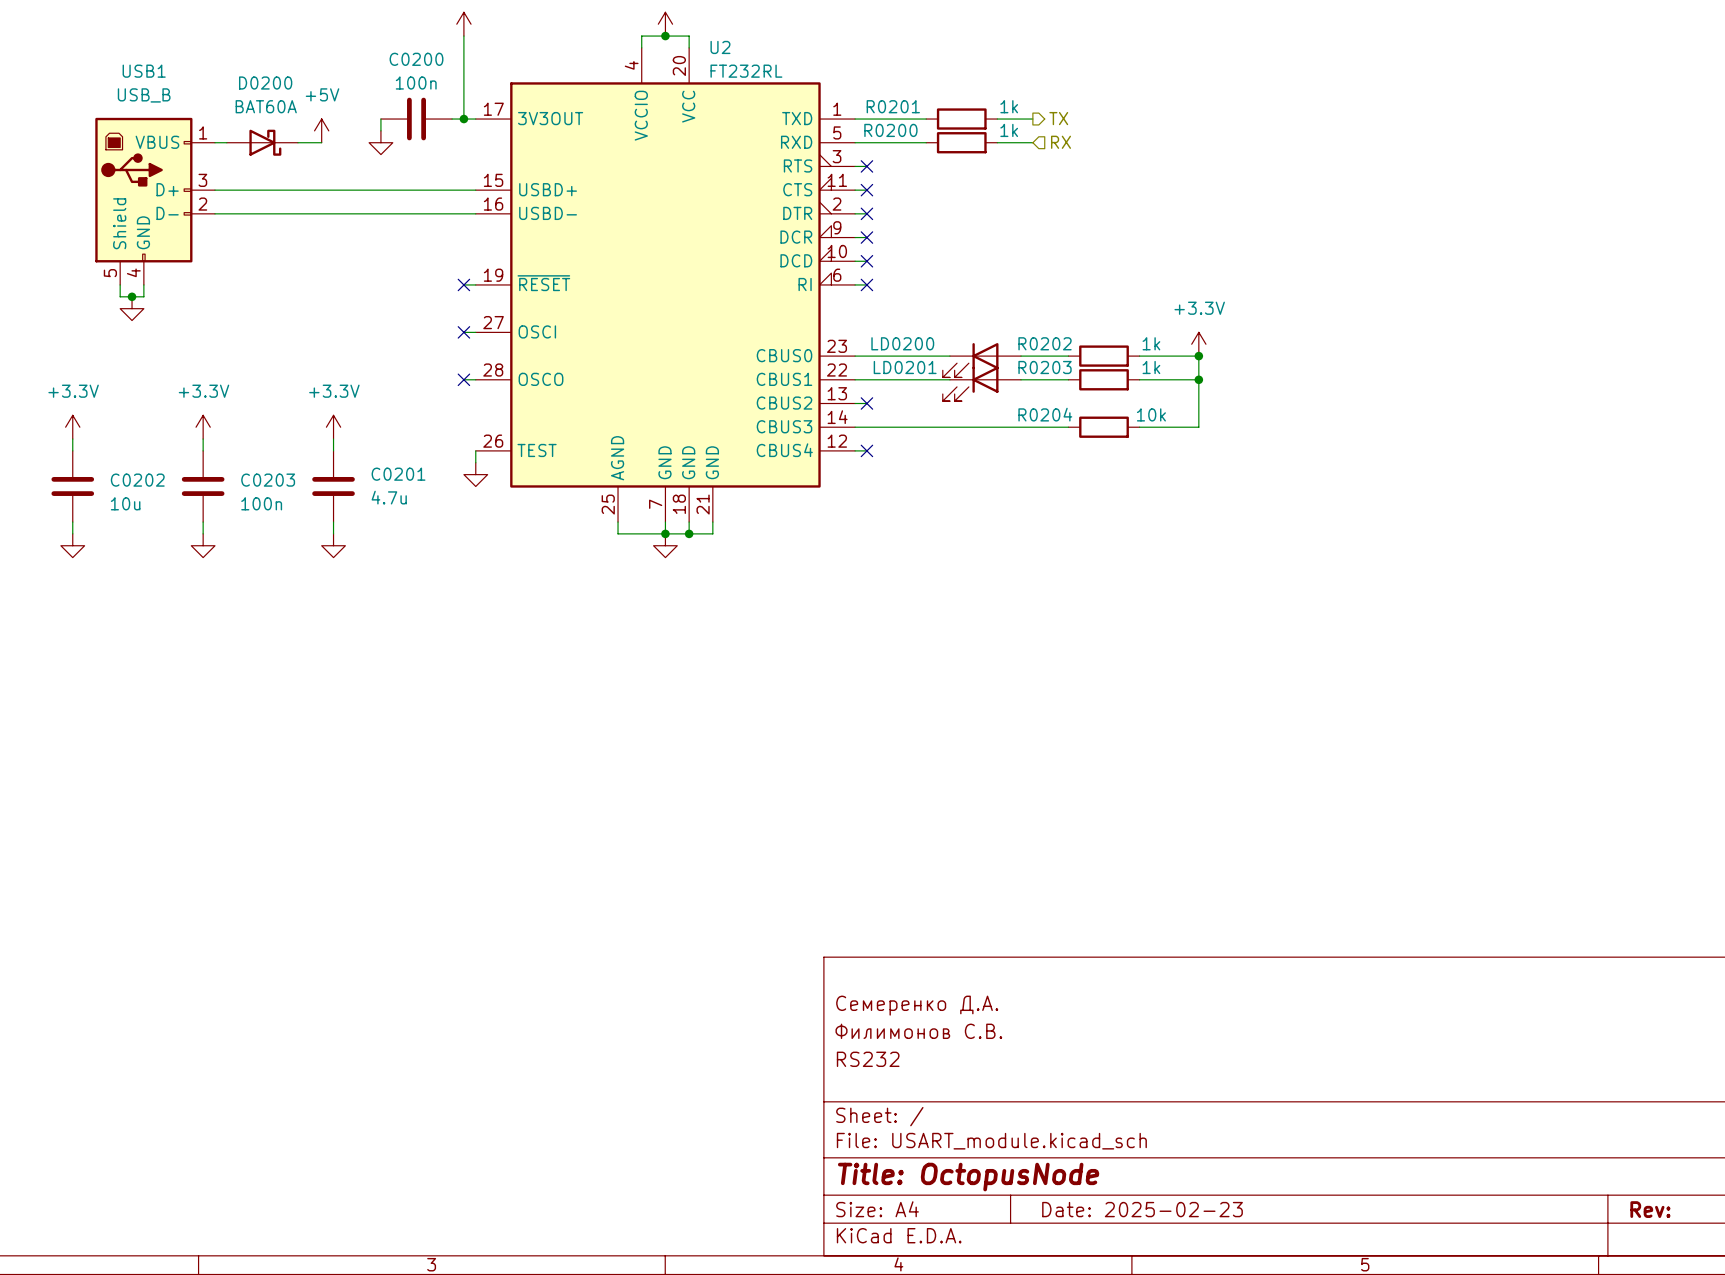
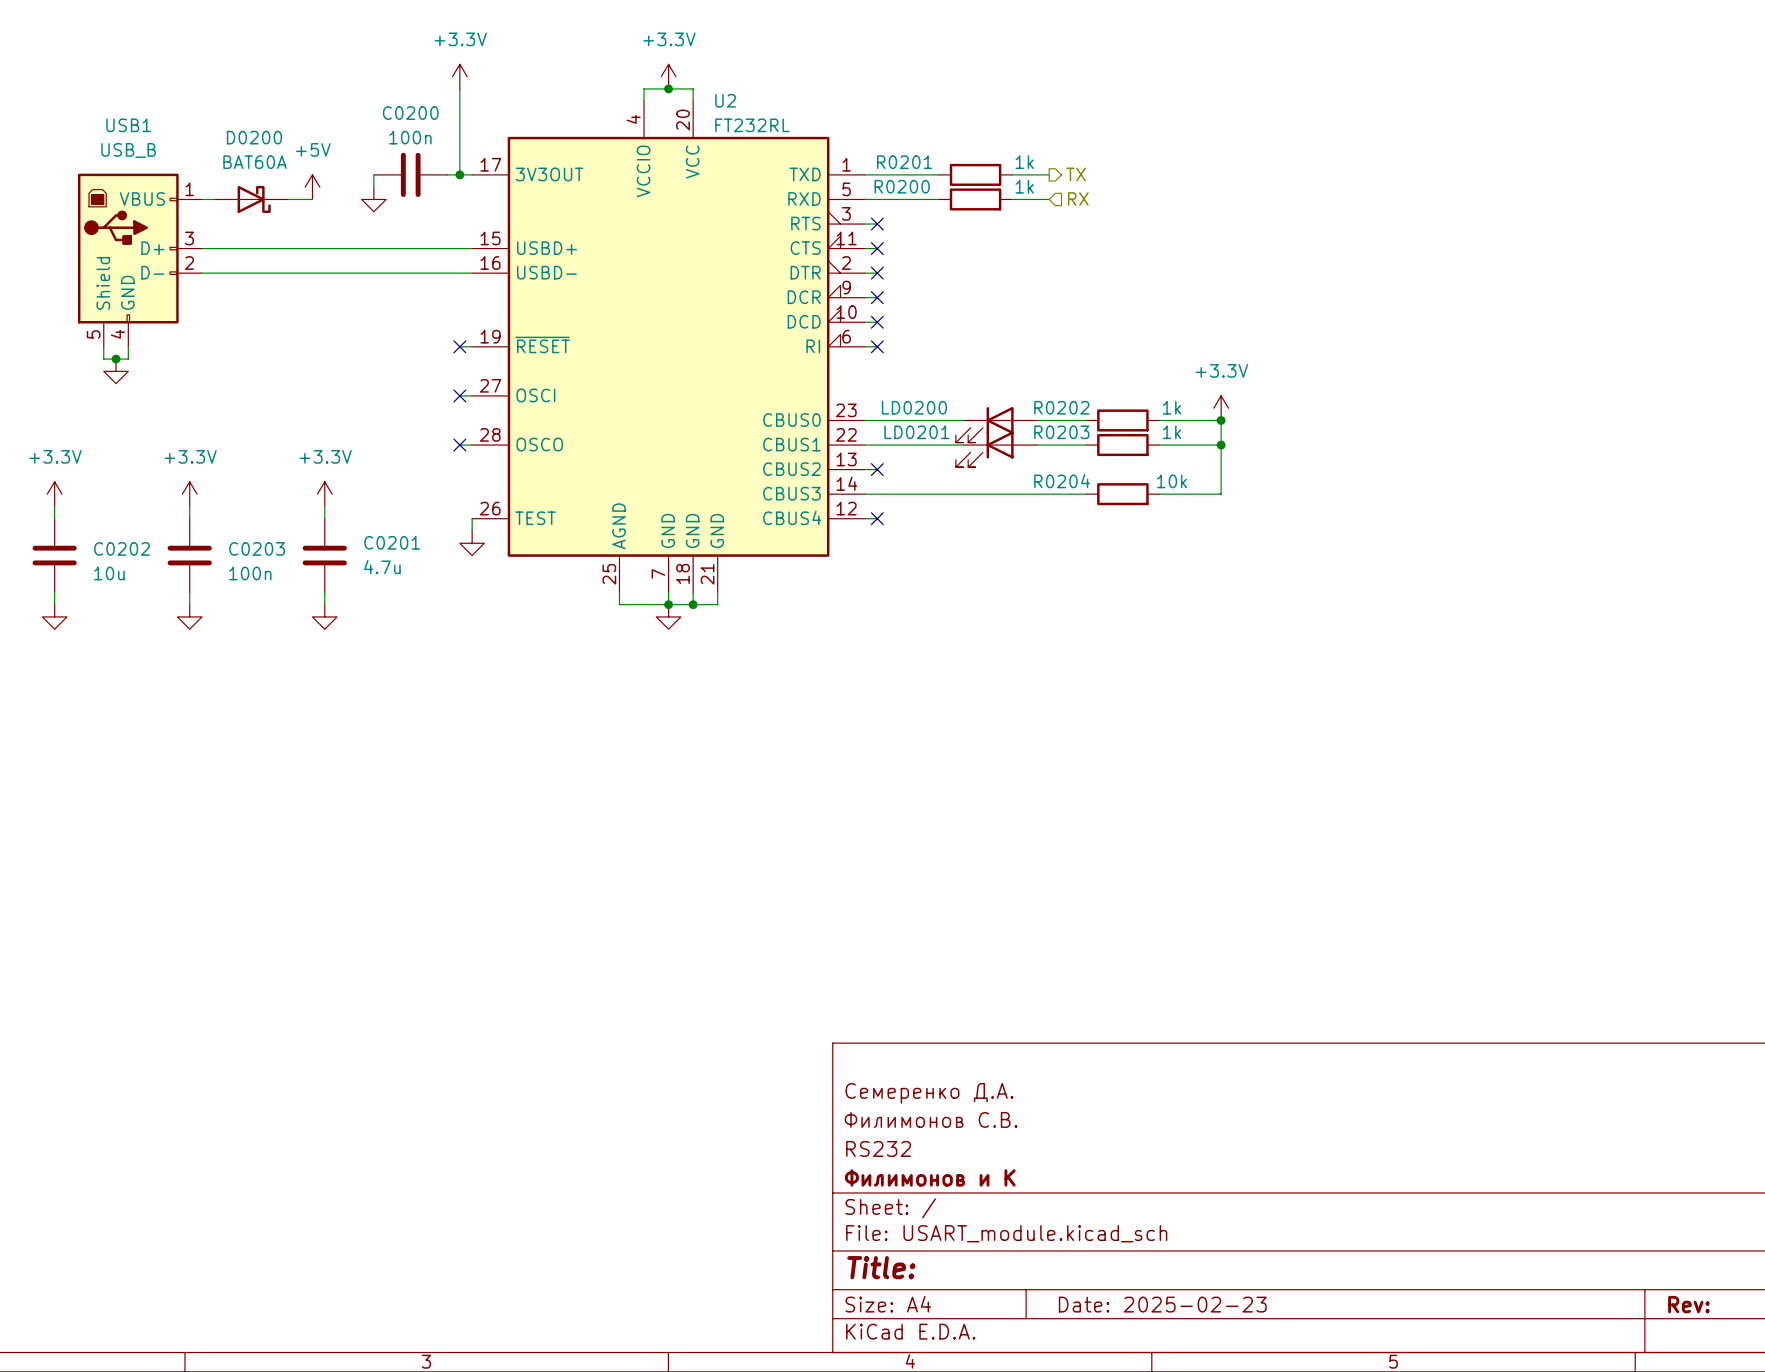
title block: none -> Филимонов и К (930, 1177)
title block: Title: OctopusNode (968, 1177) -> Title: (881, 1267)

